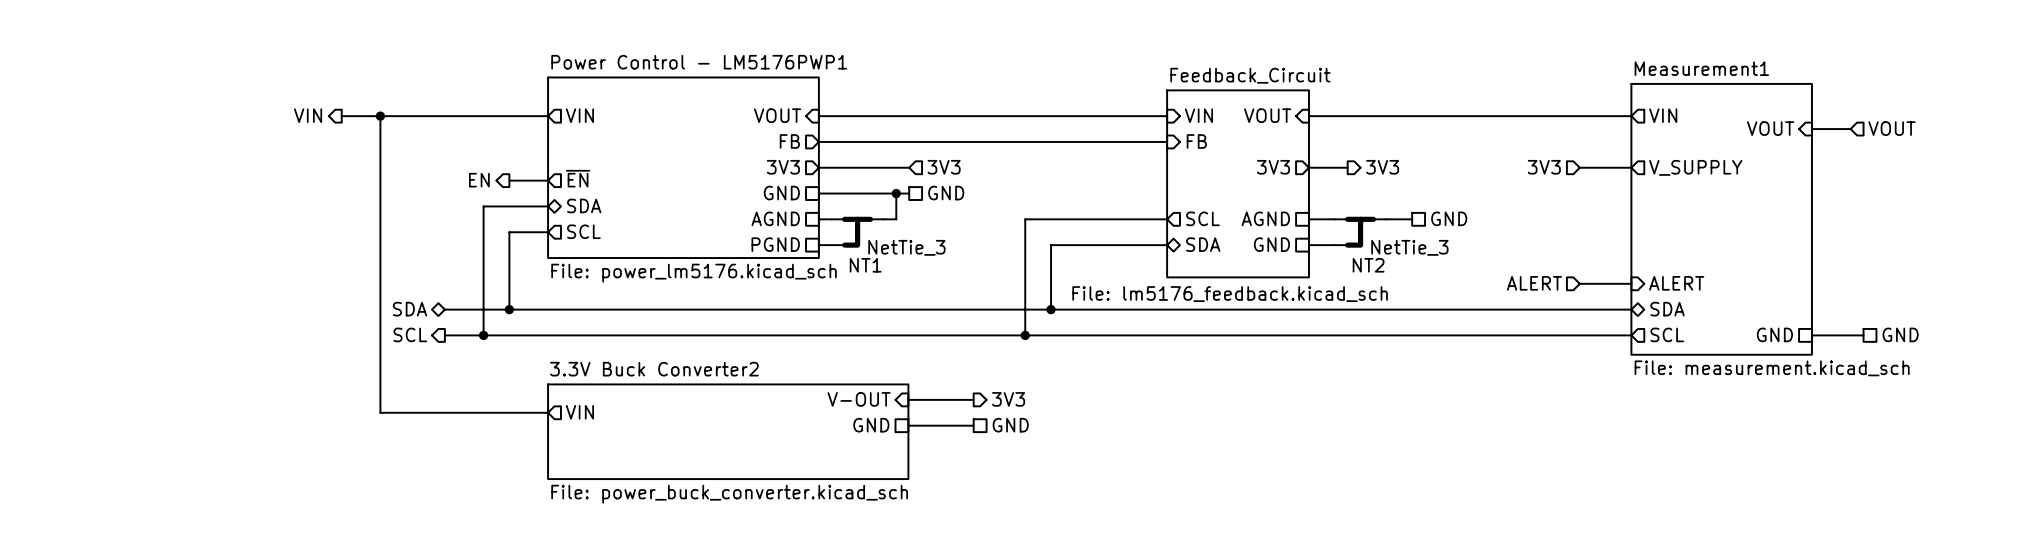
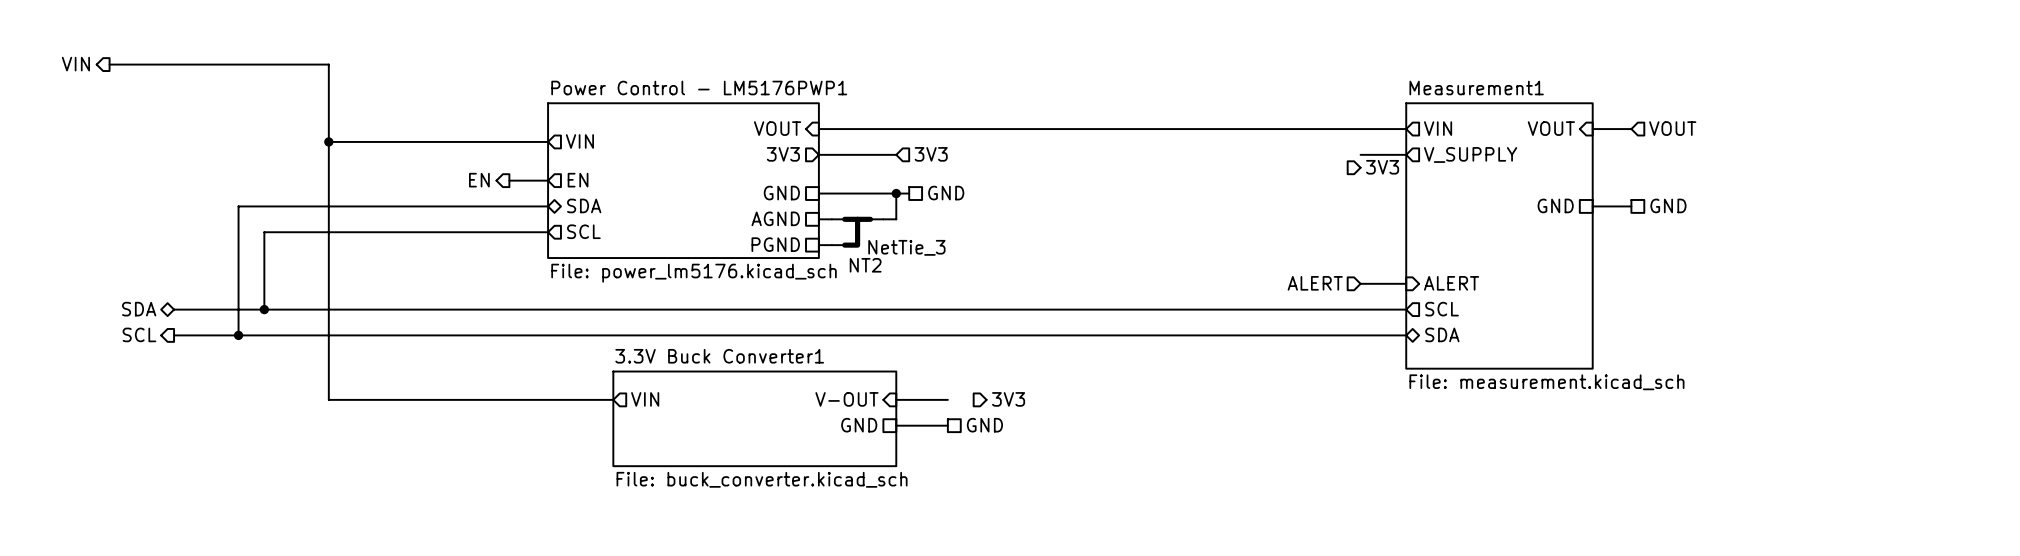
wire: none -> (109, 64) (328, 64) (328, 399) (613, 399)
sheet Power Control - LM5176PWP1 shape: [547, 76, 820, 259] -> [547, 102, 820, 259]
sheet Measurement1 shape: [1630, 83, 1813, 356] -> [1405, 102, 1594, 370]
hierarchical label position: VIN (308, 115) -> VIN (75, 64)
sheet pin position: VIN (579, 115) -> VIN (579, 141)
sheet pin position: VOUT (777, 115) -> VOUT (777, 128)
sheet pin: VIN (1198, 115) -> none
sheet pin: VOUT (1267, 115) -> none
sheet pin: VIN (1663, 115) -> none
wire: (341, 116) (548, 116) -> none
wire: (380, 116) (380, 412) (548, 412) -> none
junction position: (380, 116) -> (328, 141)
wire: (818, 116) (1167, 116) -> none
wire: (1308, 116) (1631, 116) -> none
sheet pin: none -> VIN (1438, 128)
sheet pin: none -> VOUT (1551, 128)
sheet pin: VOUT (1770, 128) -> none
hierarchical label position: VOUT (1892, 128) -> VOUT (1672, 128)
wire: none -> (818, 129) (1406, 129)
wire: (1811, 129) (1850, 129) -> (1592, 129) (1631, 129)
wire: none -> (328, 141) (548, 141)
sheet pin: FB (789, 141) -> none
wire: (818, 141) (1167, 141) -> none
sheet pin: FB (1196, 141) -> none
wire: none -> (818, 154) (896, 154)
wire: none -> (1360, 154) (1406, 154)
sheet pin position: 3V3 (783, 167) -> 3V3 (783, 154)
wire: (818, 167) (909, 167) -> none
hierarchical label position: 3V3 (944, 167) -> 3V3 (931, 154)
sheet pin: 3V3 (1273, 167) -> none
wire: (1308, 167) (1347, 167) -> none
hierarchical label: 3V3 (1544, 167) -> none
wire: (1579, 167) (1631, 167) -> none
sheet pin position: V_SUPPLY (1695, 167) -> V_SUPPLY (1470, 154)
sheet pin: ~{EN} (578, 178) -> EN (578, 180)
sheet Feedback_Circuit: File: lm5176_feedback.kicad_sch (1238, 183) -> none
sheet pin: none -> GND (1555, 205)
hierarchical label: none -> GND (1668, 205)
wire: (483, 206) (483, 335) -> (483, 206) (238, 206) (238, 335)
wire: none -> (1592, 206) (1631, 206)
sheet pin: SCL (1202, 218) -> none
sheet pin: AGND (1265, 218) -> none
hierarchical label: GND (1449, 218) -> none
wire: (1167, 219) (1025, 219) (1025, 335) -> none
wire: (1308, 219) (1334, 219) -> none
wire: (1386, 219) (1412, 219) -> none
wire: (509, 232) (509, 309) -> (509, 232) (264, 232) (264, 309)
NT2: NetTie_3 (1360, 232) -> none
sheet pin: SDA (1203, 244) -> none
sheet pin: GND (1271, 244) -> none
wire: (1167, 245) (1051, 245) (1051, 309) -> none
wire: (1308, 245) (1334, 245) -> none
NT1 name: NT1 (865, 265) -> NT2 (865, 265)
wire: none -> (1360, 283) (1406, 283)
hierarchical label position: ALERT (1534, 283) -> ALERT (1315, 283)
wire: (1579, 283) (1631, 283) -> none
sheet pin position: ALERT (1676, 283) -> ALERT (1451, 283)
hierarchical label: none -> SDA (139, 309)
wire: none -> (174, 309) (444, 309)
junction: none -> (264, 309)
hierarchical label: SDA (409, 309) -> none
junction: (509, 309) -> none
junction: (1051, 309) -> none
wire: (1406, 309) (1631, 309) -> none
sheet pin: none -> SCL (1442, 309)
sheet pin: SDA (1667, 309) -> none
hierarchical label: none -> SCL (139, 334)
hierarchical label: SCL (410, 334) -> none
sheet pin: none -> SDA (1442, 334)
sheet pin: SCL (1667, 334) -> none
sheet pin: GND (1774, 334) -> none
hierarchical label: GND (1900, 334) -> none
wire: none -> (174, 335) (444, 335)
junction: none -> (238, 335)
junction: (483, 335) -> none
junction: (1025, 335) -> none
wire: (1406, 335) (1631, 335) -> none
wire: (1811, 335) (1863, 335) -> none
sheet pin position: V-OUT (859, 399) -> V-OUT (846, 399)
wire: none -> (896, 399) (908, 399)
wire: (947, 399) (973, 399) -> none
sheet pin position: VIN (579, 412) -> VIN (645, 399)
sheet 3.3V Buck Converter1: none -> File: buck_converter.kicad_sch (754, 418)
sheet pin position: GND (871, 425) -> GND (859, 425)
wire: none -> (896, 425) (908, 425)
wire: (947, 425) (973, 425) -> none
hierarchical label position: GND (1010, 425) -> GND (984, 425)
sheet 3.3V Buck Converter2: File: power_buck_converter.kicad_sch (728, 431) -> none

